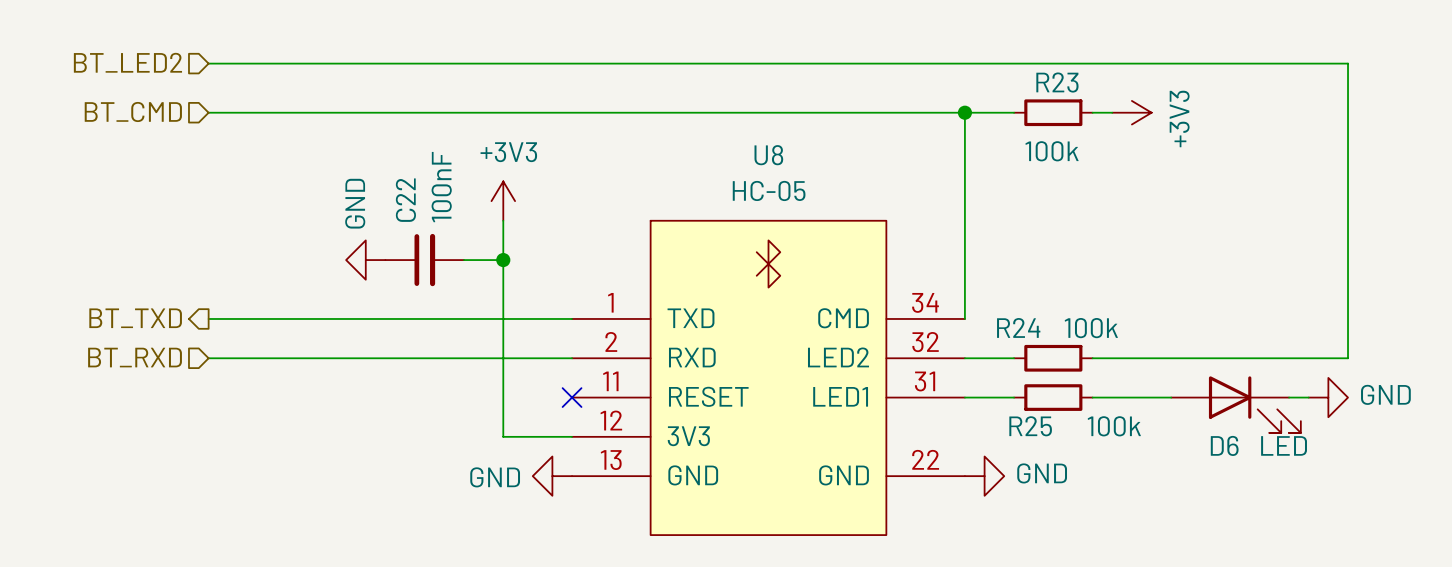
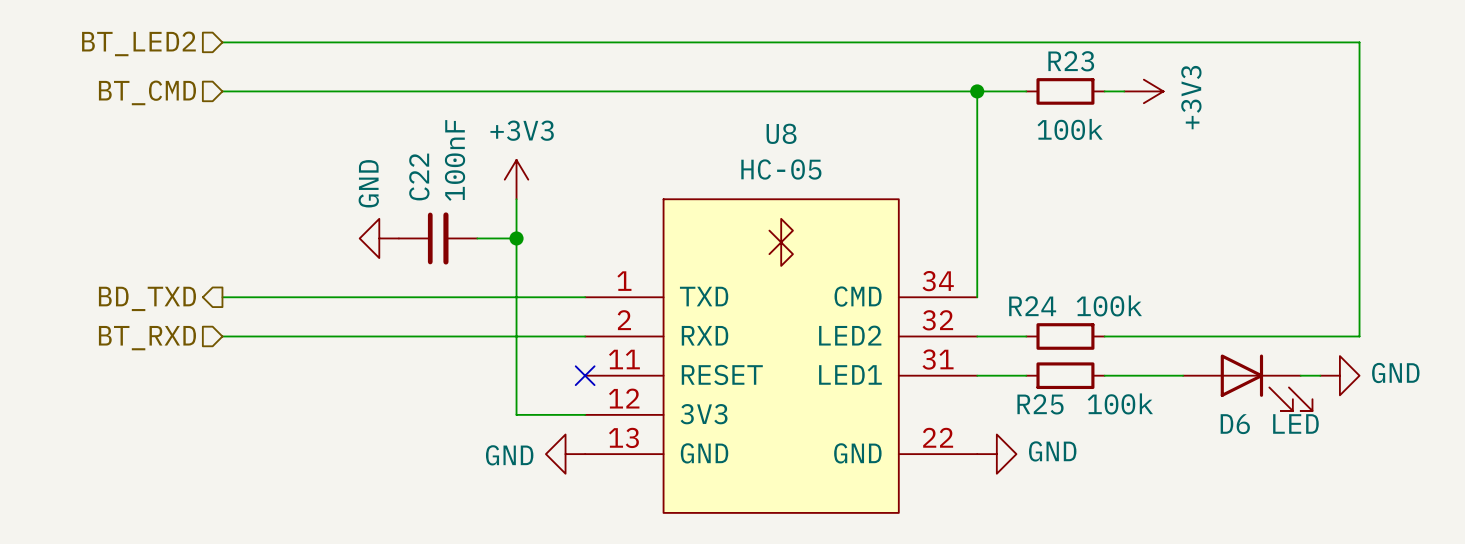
hierarchical label: BT_TXD (135, 318) -> BD_TXD (147, 298)

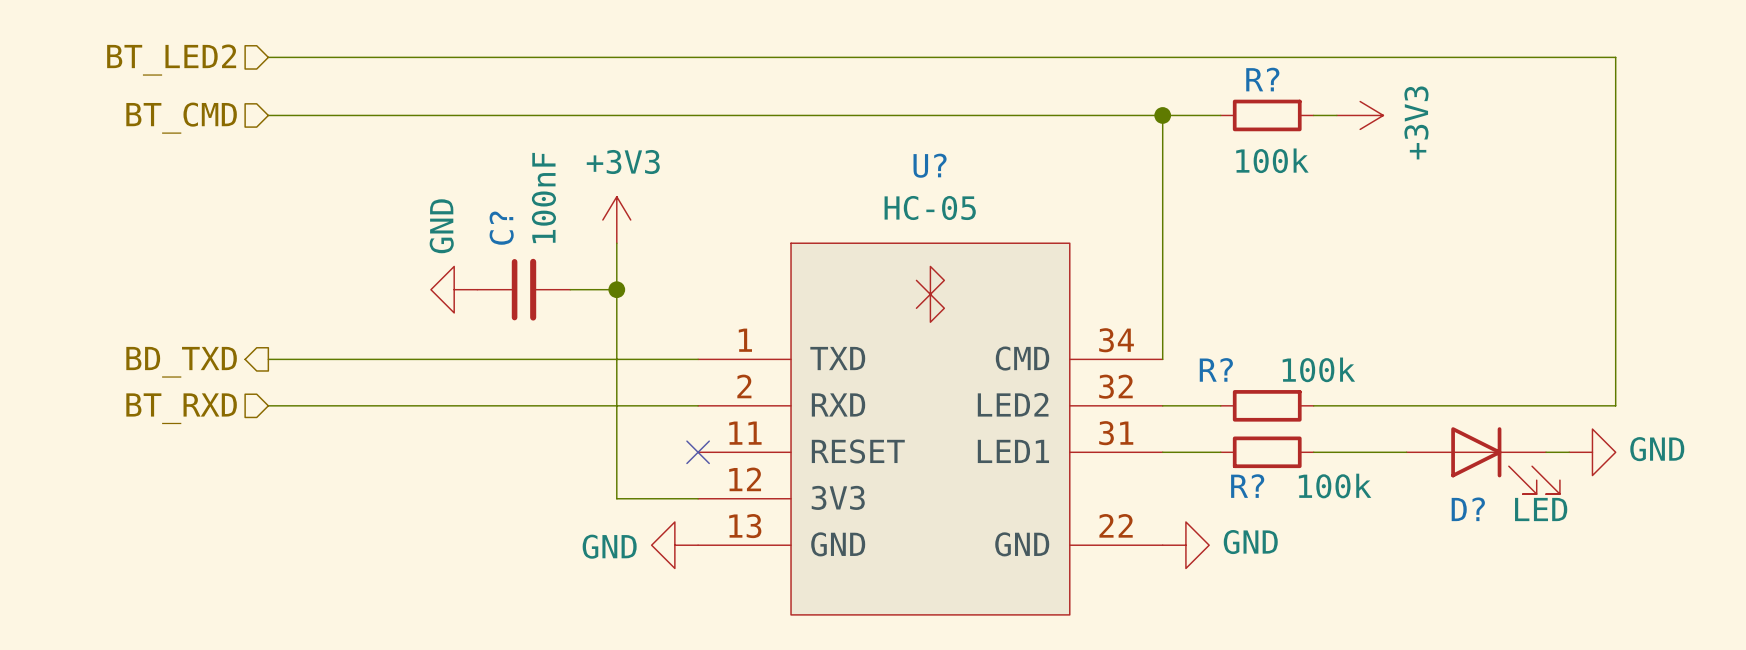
R23 name: R23 (1071, 61) -> R? (1262, 79)
U8 name: U8 (781, 133) -> U? (930, 165)
C22 name: C22 (419, 177) -> C? (501, 228)
R24 name: R24 (1032, 306) -> R? (1216, 369)
R25 name: R25 (1040, 404) -> R? (1247, 486)
D6 name: D6 (1235, 424) -> D? (1468, 509)

